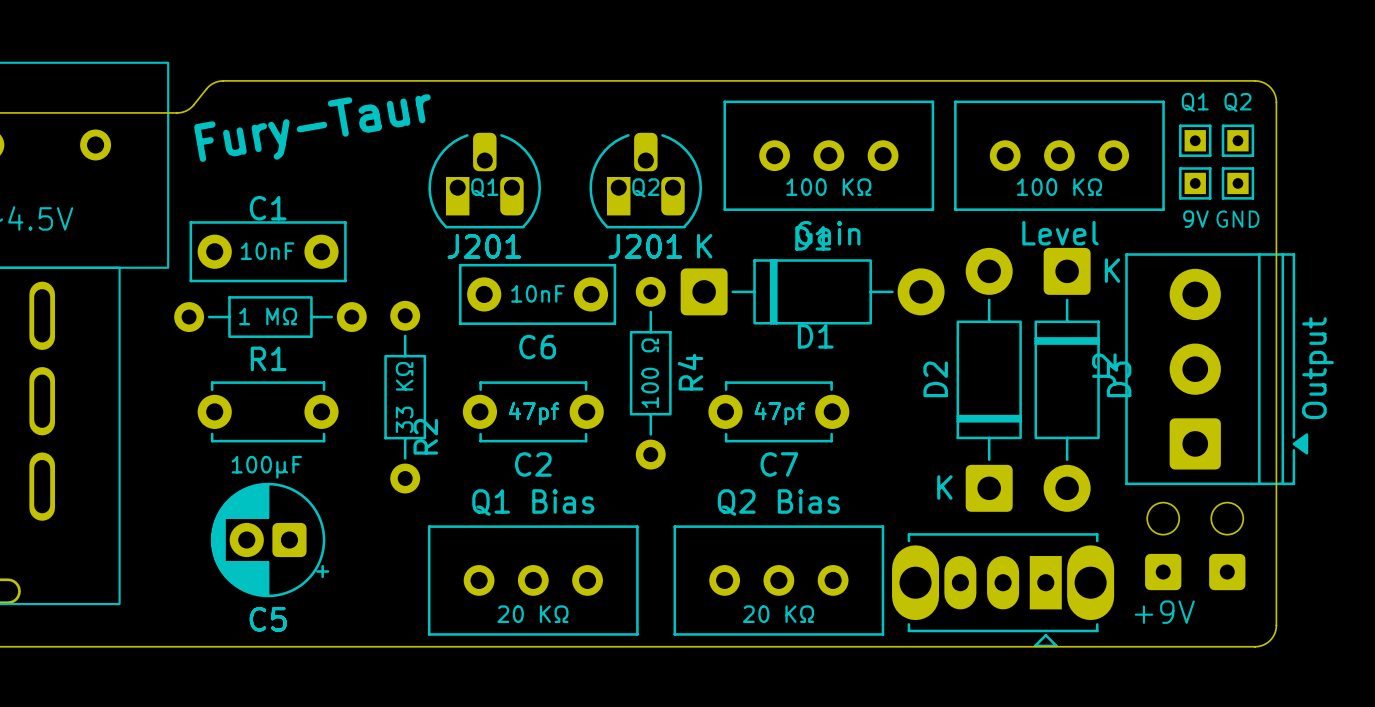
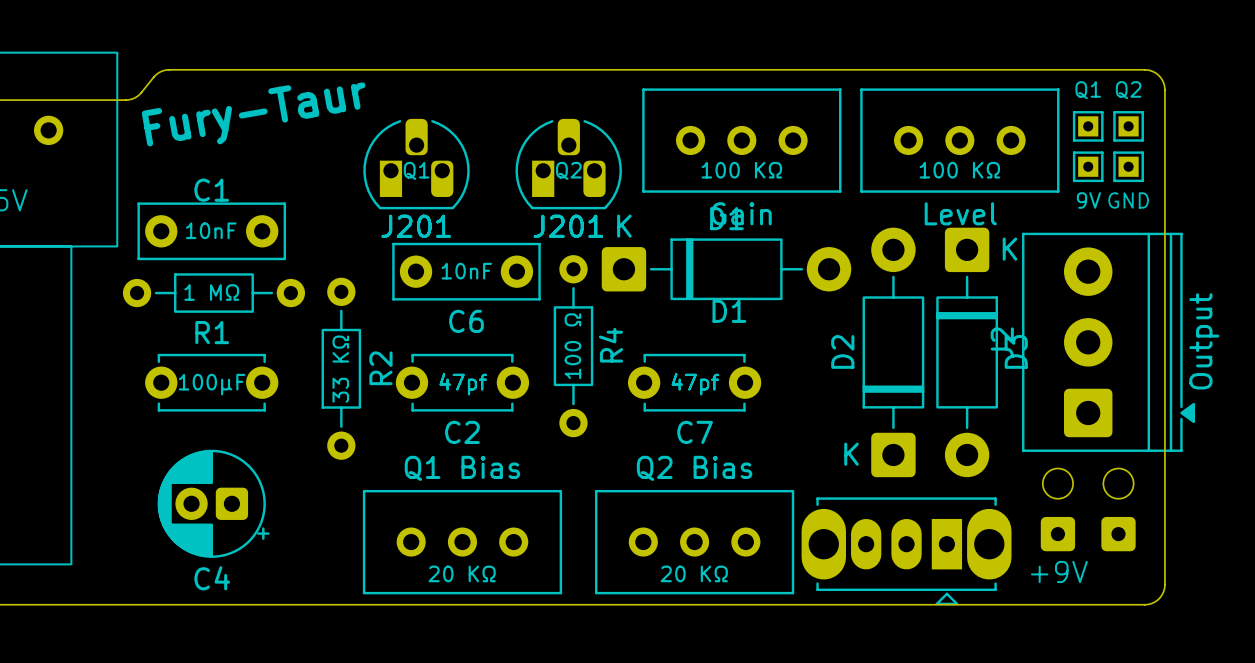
text position: R2 (425, 436) -> R2 (380, 368)
text position: 100μF (266, 467) -> 100μF (212, 384)
C5 name: C5 (268, 619) -> C4 (212, 578)
text: C5 (268, 619) -> none

